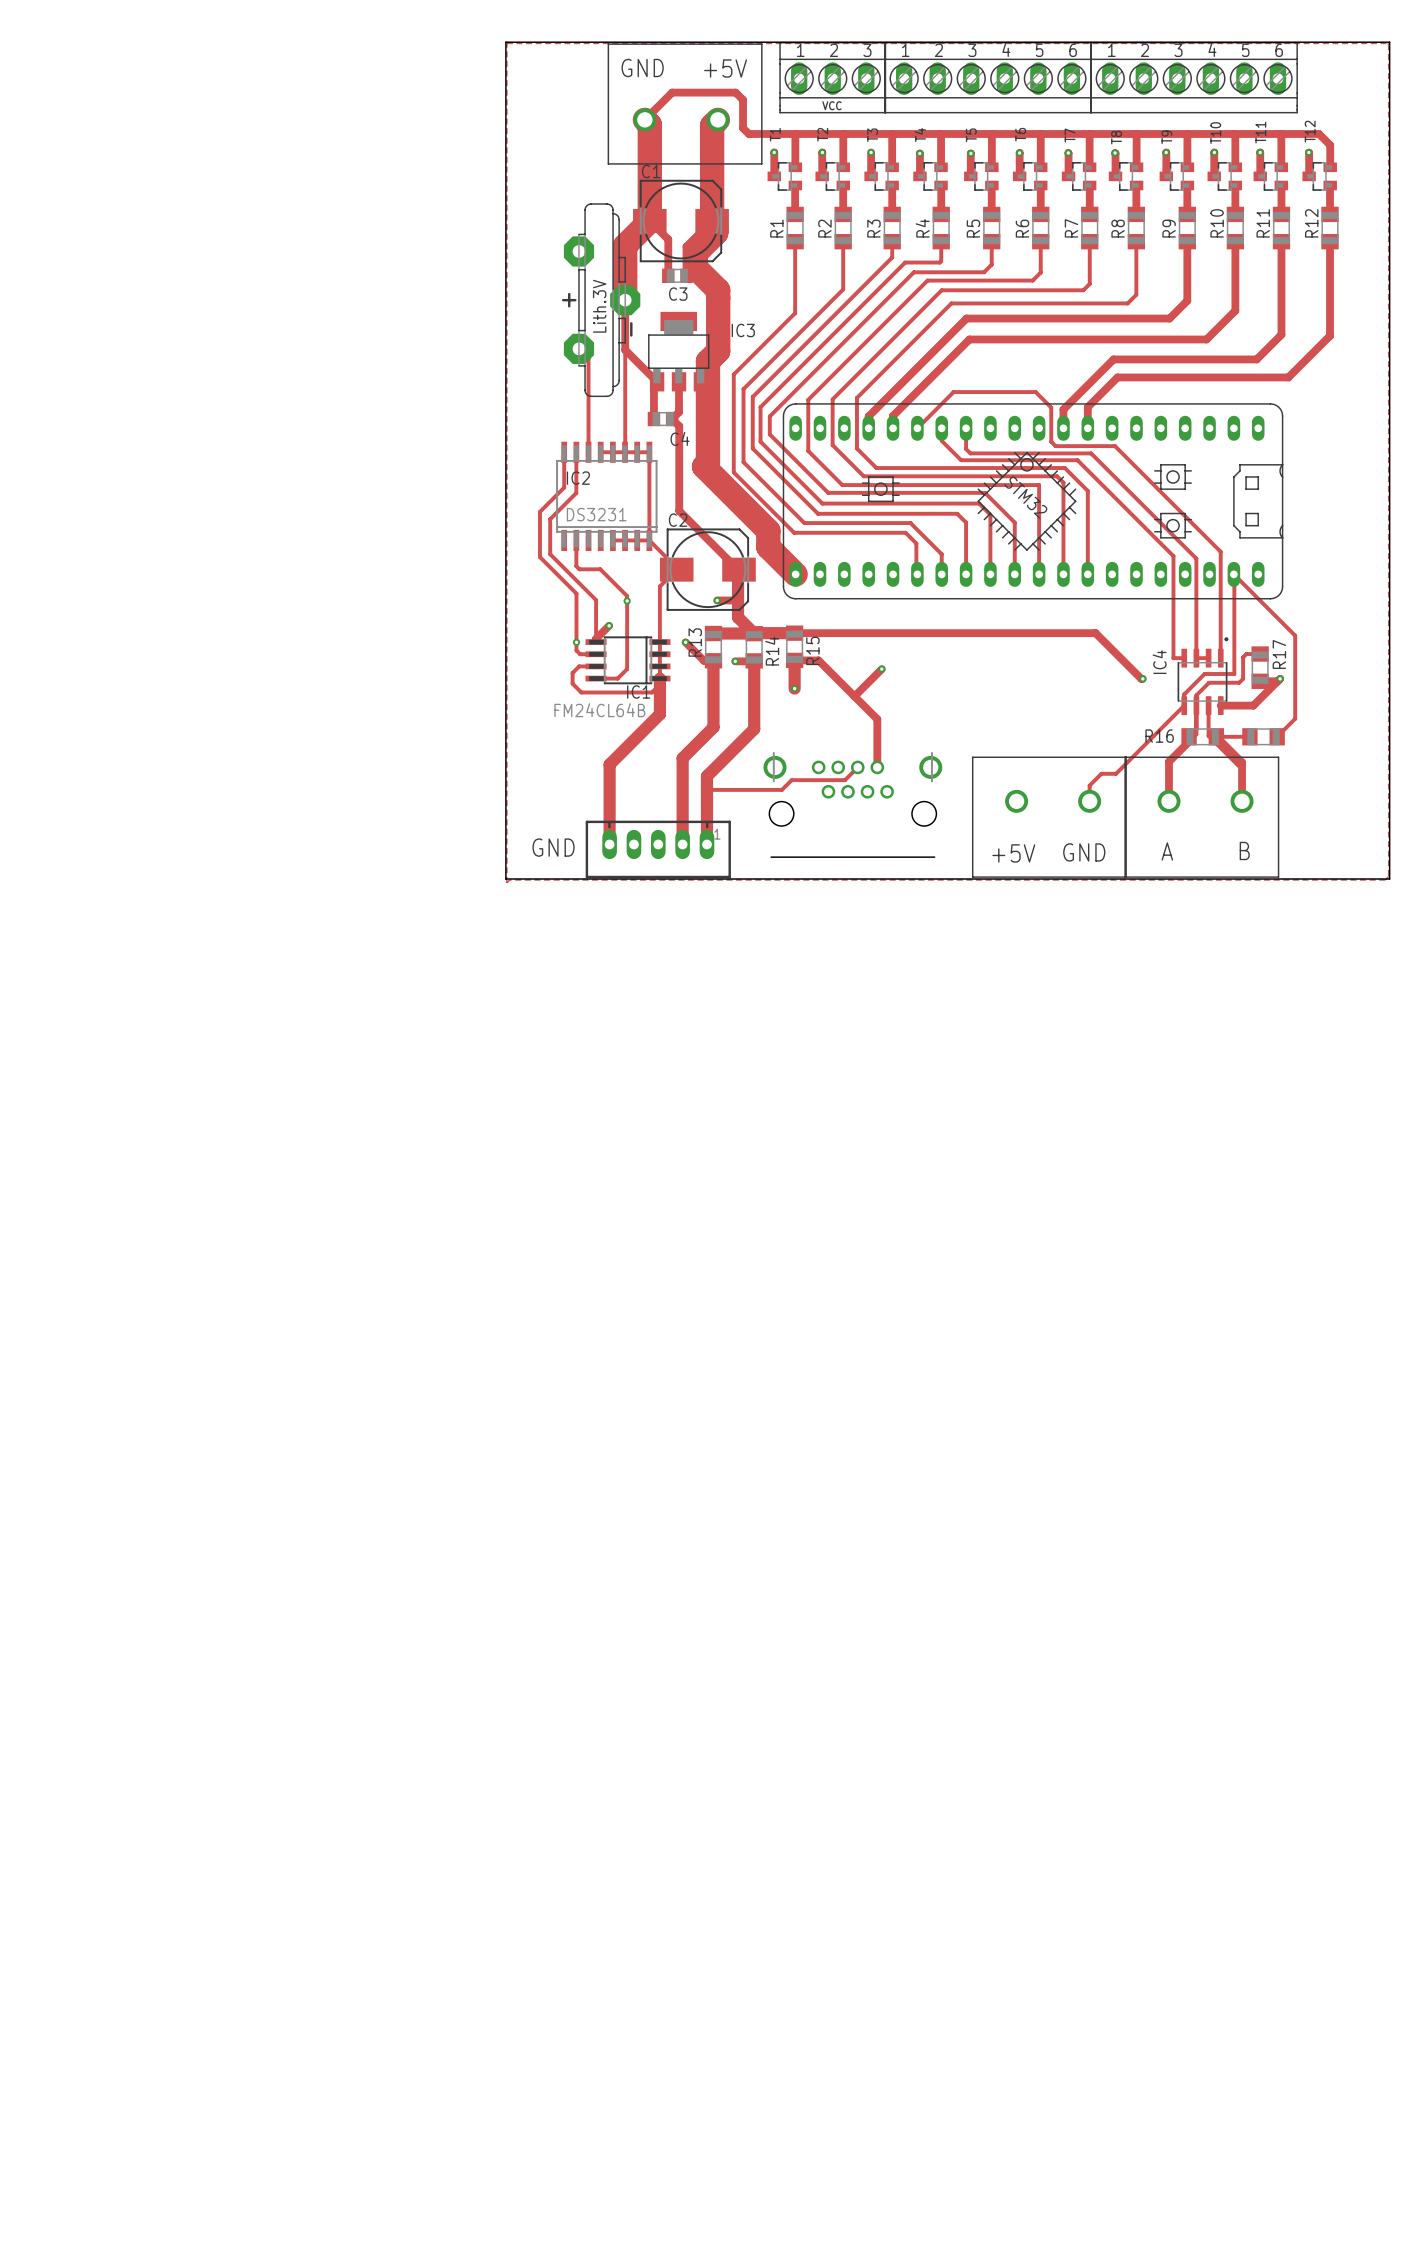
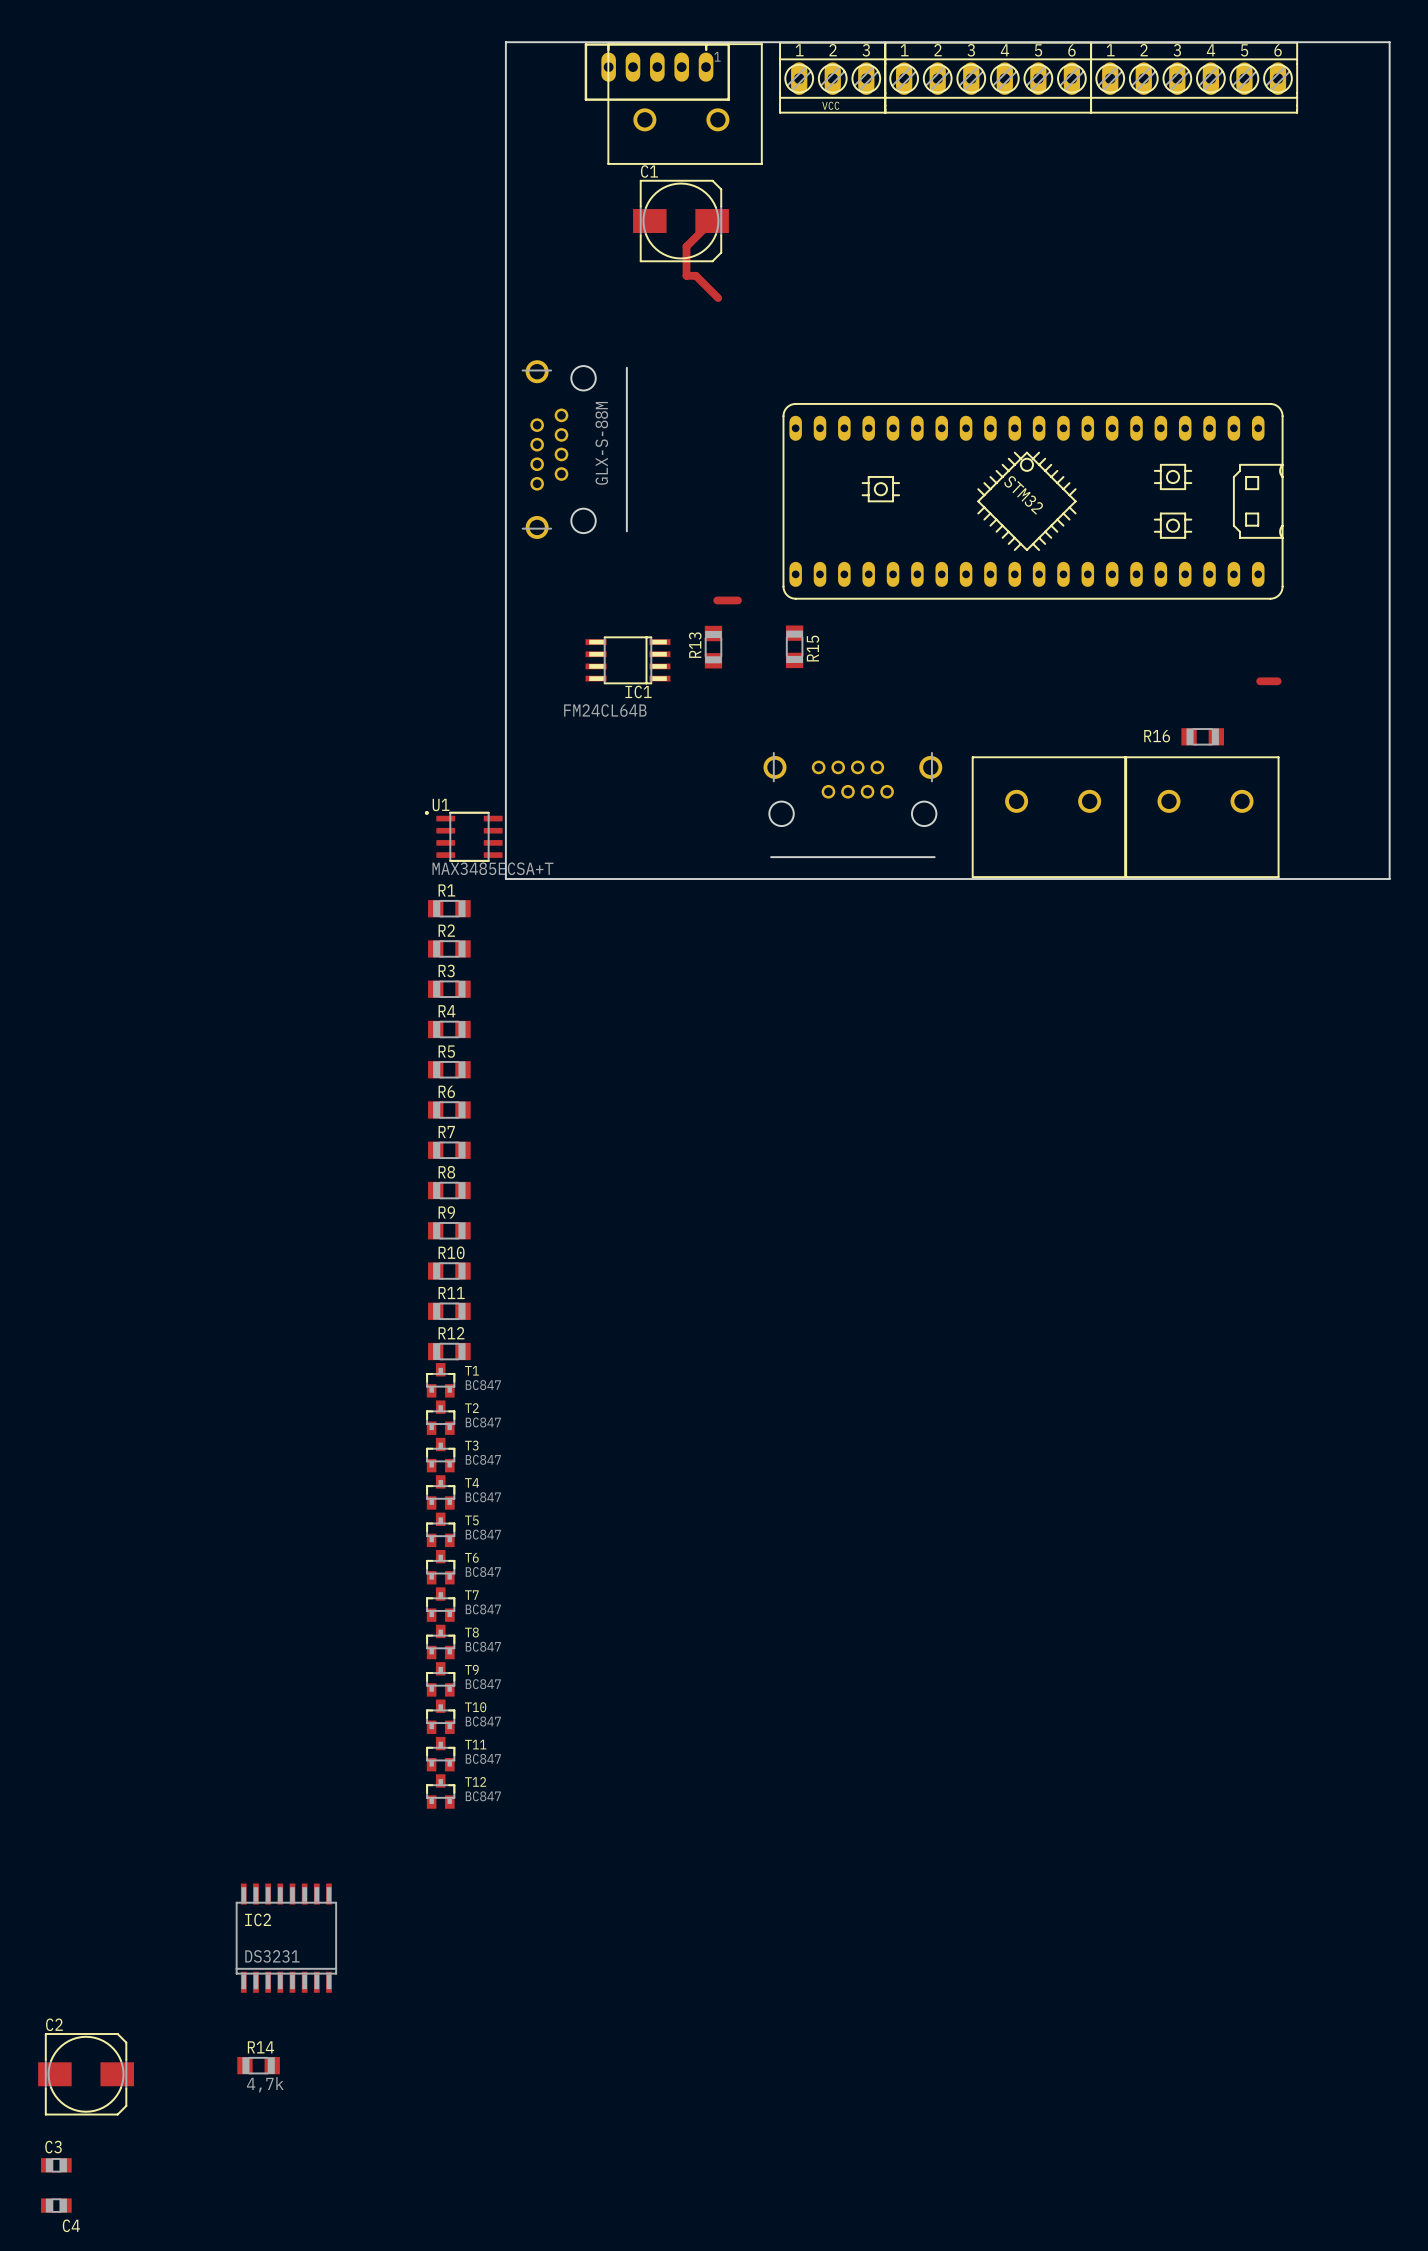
zone outline: (506, 43) (1387, 43) (1388, 876) (1385, 879) (509, 879) (506, 882) (506, 43) -> none
text: GND (642, 68) -> none
text: +5V (725, 68) -> none
part: none -> (657, 72)
track: (717, 119) (712, 125) (712, 221) (716, 225) (716, 232) (695, 253) (695, 267) (718, 290) (718, 351) -> none
track: (796, 133) (795, 167) -> none
track: (892, 133) (892, 167) -> none
track: (940, 133) (941, 167) -> none
track: (992, 133) (991, 167) -> none
track: (1040, 133) (1040, 167) -> none
track: (1090, 133) (1089, 167) -> none
track: (1135, 133) (1136, 167) -> none
track: (1188, 133) (1187, 167) -> none
track: (1234, 133) (1235, 167) -> none
track: (1280, 133) (1281, 167) -> none
track: (843, 134) (843, 167) -> none
track: (774, 152) (774, 176) -> none
via: (774, 152) -> none
track: (822, 152) (822, 176) -> none
via: (822, 152) -> none
track: (871, 152) (871, 176) -> none
via: (871, 152) -> none
via: (1019, 152) -> none
track: (1068, 152) (1068, 176) -> none
via: (1068, 152) -> none
track: (1115, 152) (1115, 176) -> none
via: (1115, 152) -> none
track: (1166, 152) (1166, 176) -> none
via: (1166, 152) -> none
track: (1214, 152) (1214, 176) -> none
via: (1214, 152) -> none
track: (1260, 152) (1260, 176) -> none
via: (1260, 152) -> none
track: (1308, 152) (1309, 176) -> none
via: (1308, 152) -> none
track: (919, 153) (919, 176) -> none
via: (919, 153) -> none
track: (970, 153) (970, 176) -> none
via: (970, 153) -> none
track: (1019, 153) (1019, 176) -> none
track: (1330, 167) (1330, 145) (1319, 133) (748, 133) (743, 128) (743, 99) (735, 92) (672, 92) (644, 119) (649, 124) (649, 221) -> none
T1 rotation: 0° (784, 176) -> 90° clockwise (440, 1380)
T1 position: (784, 176) -> (440, 1380)
T2 rotation: 0° (832, 176) -> 90° clockwise (440, 1417)
T2 position: (832, 176) -> (440, 1417)
T3 rotation: 0° (881, 176) -> 90° clockwise (440, 1455)
T3 position: (881, 176) -> (440, 1455)
T4 rotation: 0° (930, 176) -> 90° clockwise (440, 1492)
T4 position: (930, 176) -> (440, 1492)
T5 rotation: 0° (981, 176) -> 90° clockwise (440, 1529)
T5 position: (981, 176) -> (440, 1529)
T6 rotation: 0° (1030, 176) -> 90° clockwise (440, 1567)
T6 position: (1030, 176) -> (440, 1567)
T7 rotation: 0° (1079, 176) -> 90° clockwise (440, 1604)
T7 position: (1079, 176) -> (440, 1604)
T8 rotation: 0° (1126, 176) -> 90° clockwise (440, 1641)
T8 position: (1126, 176) -> (440, 1641)
T9 rotation: 0° (1176, 176) -> 90° clockwise (440, 1679)
T9 position: (1176, 176) -> (440, 1679)
T10 rotation: 0° (1224, 176) -> 90° clockwise (440, 1716)
T10 position: (1224, 176) -> (440, 1716)
T11 rotation: 0° (1270, 176) -> 90° clockwise (440, 1754)
T11 position: (1270, 176) -> (440, 1754)
T12 rotation: 0° (1319, 176) -> 90° clockwise (440, 1791)
T12 position: (1319, 176) -> (440, 1791)
track: (795, 185) (795, 214) -> none
track: (843, 185) (843, 214) -> none
track: (892, 185) (892, 214) -> none
track: (941, 185) (941, 214) -> none
track: (991, 185) (991, 214) -> none
track: (1040, 185) (1040, 214) -> none
track: (1089, 185) (1089, 214) -> none
track: (1136, 185) (1136, 214) -> none
track: (1187, 185) (1187, 214) -> none
track: (1235, 185) (1235, 214) -> none
track: (1281, 185) (1281, 214) -> none
track: (1330, 185) (1330, 214) -> none
track: (649, 221) (625, 245) (625, 300) -> none
track: (649, 221) (668, 239) (668, 275) -> none
R1 rotation: 0° (795, 228) -> 90° clockwise (449, 908)
R1 position: (795, 228) -> (449, 908)
R2 rotation: 0° (843, 228) -> 90° clockwise (449, 948)
R2 position: (843, 228) -> (449, 948)
R3 rotation: 0° (892, 228) -> 90° clockwise (449, 989)
R3 position: (892, 228) -> (449, 989)
R4 rotation: 0° (941, 228) -> 90° clockwise (449, 1029)
R4 position: (941, 228) -> (449, 1029)
R5 rotation: 0° (991, 228) -> 90° clockwise (449, 1069)
R5 position: (991, 228) -> (449, 1069)
R6 rotation: 0° (1040, 228) -> 90° clockwise (449, 1109)
R6 position: (1040, 228) -> (449, 1109)
R7 rotation: 0° (1089, 228) -> 90° clockwise (449, 1150)
R7 position: (1089, 228) -> (449, 1150)
R8 rotation: 0° (1136, 228) -> 90° clockwise (449, 1190)
R8 position: (1136, 228) -> (449, 1190)
R9 rotation: 0° (1187, 228) -> 90° clockwise (449, 1230)
R9 position: (1187, 228) -> (449, 1230)
R10 rotation: 0° (1235, 228) -> 90° clockwise (449, 1271)
R10 position: (1235, 228) -> (449, 1271)
R11 rotation: 0° (1281, 228) -> 90° clockwise (449, 1311)
R11 position: (1281, 228) -> (449, 1311)
R12 rotation: 0° (1330, 228) -> 90° clockwise (449, 1351)
R12 position: (1330, 228) -> (449, 1351)
track: (795, 241) (795, 313) (733, 374) (733, 472) (794, 532) (905, 532) (916, 543) (917, 574) -> none
track: (843, 241) (843, 289) (743, 389) (743, 462) (804, 523) (910, 523) (941, 554) (941, 574) -> none
track: (892, 241) (892, 257) (752, 396) (752, 448) (818, 513) (957, 513) (966, 522) (966, 574) -> none
track: (941, 241) (939, 262) (905, 262) (760, 407) (760, 441) (822, 503) (979, 503) (990, 514) (990, 574) -> none
track: (991, 241) (991, 264) (984, 272) (913, 272) (769, 416) (769, 434) (828, 492) (985, 492) (1014, 522) (1014, 574) -> none
track: (1040, 241) (1040, 272) (1032, 280) (927, 280) (808, 399) (808, 450) (842, 485) (1039, 485) (1039, 574) -> none
track: (1089, 241) (1089, 283) (1083, 290) (941, 290) (832, 399) (832, 445) (863, 476) (1057, 476) (1063, 482) (1063, 574) -> none
track: (1136, 241) (1136, 294) (1127, 303) (951, 303) (856, 397) (856, 448) (876, 468) (1064, 468) (1087, 490) (1087, 574) -> none
track: (1187, 241) (1187, 300) (1169, 318) (966, 318) (868, 416) (868, 428) -> none
track: (1235, 241) (1235, 310) (1206, 339) (969, 339) (893, 415) (893, 428) -> none
track: (1281, 241) (1281, 334) (1256, 359) (1113, 359) (1063, 409) (1063, 428) -> none
track: (1330, 241) (1330, 335) (1288, 377) (1117, 377) (1087, 407) (1087, 428) -> none
C3 position: (677, 275) -> (56, 2165)
C3 name position: C3 (678, 294) -> C3 (53, 2147)
part: (601, 300) -> none
track: (625, 300) (625, 349) (657, 381) (653, 384) (653, 419) -> none
track: (625, 300) (625, 452) -> none
track: (578, 348) (588, 358) (588, 452) -> none
IC3: (678, 351) -> none
track: (718, 351) (707, 361) (707, 462) (704, 466) -> none
track: (679, 381) (679, 412) (672, 419) (679, 426) (679, 510) (738, 569) -> none
C4 position: (663, 419) -> (56, 2205)
track: (917, 428) (953, 392) (1035, 392) (1051, 407) (1051, 441) (1055, 446) (1115, 446) (1220, 551) (1220, 658) -> none
track: (941, 428) (941, 440) (961, 460) (1077, 460) (1173, 556) (1173, 658) (1184, 658) -> none
track: (966, 428) (966, 449) (970, 453) (1091, 453) (1196, 558) (1196, 658) -> none
part: none -> GLX-S-88M (574, 449)
track: (564, 452) (564, 487) (539, 511) (539, 557) (576, 593) (576, 650) (580, 654) (596, 654) -> none
track: (576, 452) (576, 493) (550, 519) (550, 554) (596, 600) (596, 642) -> none
track: (600, 452) (649, 452) (649, 540) -> none
track: (704, 466) (768, 530) (768, 547) (795, 574) -> none
IC2 position: (606, 496) -> (286, 1938)
track: (576, 540) (576, 566) (579, 569) (600, 569) (627, 596) (627, 669) (617, 678) (596, 678) -> none
track: (612, 540) (649, 540) -> none
track: (649, 540) (676, 567) (659, 586) (659, 684) (651, 692) (581, 692) (572, 683) (572, 673) (579, 666) (596, 666) -> none
C2 position: (707, 569) -> (86, 2074)
track: (738, 569) (738, 617) (754, 633) (1095, 633) (1142, 678) -> none
track: (1233, 574) (1295, 635) (1295, 718) (1277, 736) -> none
track: (1234, 574) (1234, 673) (1204, 673) (1184, 694) (1184, 705) (1116, 773) (1101, 773) (1089, 785) (1089, 801) -> none
via: (627, 600) -> none
via: (717, 600) -> none
track: (609, 625) (596, 639) -> none
via: (609, 625) -> none
track: (713, 633) (754, 633) -> none
via: (576, 642) -> none
track: (685, 642) (704, 660) (713, 660) (713, 727) (682, 758) (682, 844) -> none
via: (685, 642) -> none
R14 rotation: 0° (754, 647) -> 90° clockwise (258, 2065)
R14 position: (754, 647) -> (258, 2065)
R14 name position: R14 (772, 651) -> R14 (260, 2047)
track: (1260, 654) (1246, 654) (1243, 657) (1243, 678) (1239, 682) (1209, 682) (1196, 695) (1196, 734) (1169, 761) (1169, 801) -> none
track: (1196, 658) (1208, 658) -> none
track: (735, 661) (754, 660) (754, 729) (706, 776) (706, 844) -> none
via: (735, 661) -> none
R17: (1260, 667) -> none
track: (881, 669) (854, 695) -> none
via: (881, 669) -> none
IC4: (1203, 676) -> none
track: (659, 678) (659, 714) (609, 764) (609, 844) -> none
via: (1142, 678) -> none
track: (1280, 678) (1253, 705) (1220, 705) -> none
via: (1280, 678) -> none
track: (794, 688) (794, 660) (818, 660) (877, 719) (877, 767) -> none
via: (794, 688) -> none
track: (1208, 705) (1208, 735) (1242, 769) (1242, 801) (1242, 762) (1216, 736) (1249, 736) -> none
part: (1263, 736) -> none
track: (857, 767) (845, 780) (791, 780) (781, 789) (706, 791) -> none
U1: none -> MAX3485ECSA+T (463, 836)
text: GND (553, 847) -> none
part: (658, 849) -> none
text: B (1244, 850) -> none
text: A (1167, 851) -> none
text: GND (1084, 852) -> none
text: +5V (1013, 853) -> none
T1 value: none -> BC847 (483, 1385)
T2 value: none -> BC847 (483, 1422)
T3 value: none -> BC847 (483, 1459)
T4 value: none -> BC847 (483, 1497)
T5 value: none -> BC847 (483, 1534)
T6 value: none -> BC847 (483, 1572)
T7 value: none -> BC847 (483, 1609)
T8 value: none -> BC847 (483, 1646)
T9 value: none -> BC847 (483, 1684)
T10 value: none -> BC847 (483, 1721)
T11 value: none -> BC847 (483, 1758)
T12 value: none -> BC847 (483, 1796)
R14 value: none -> 4,7k (265, 2084)

